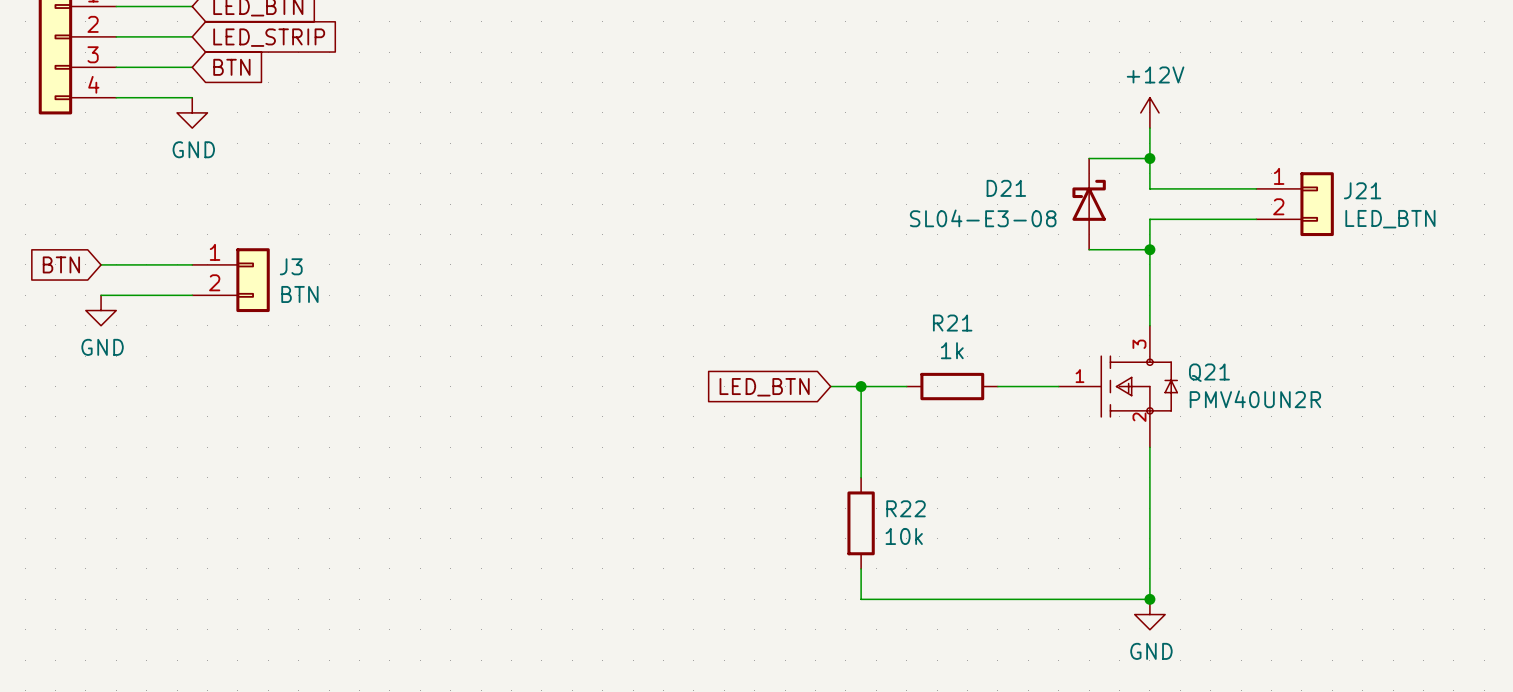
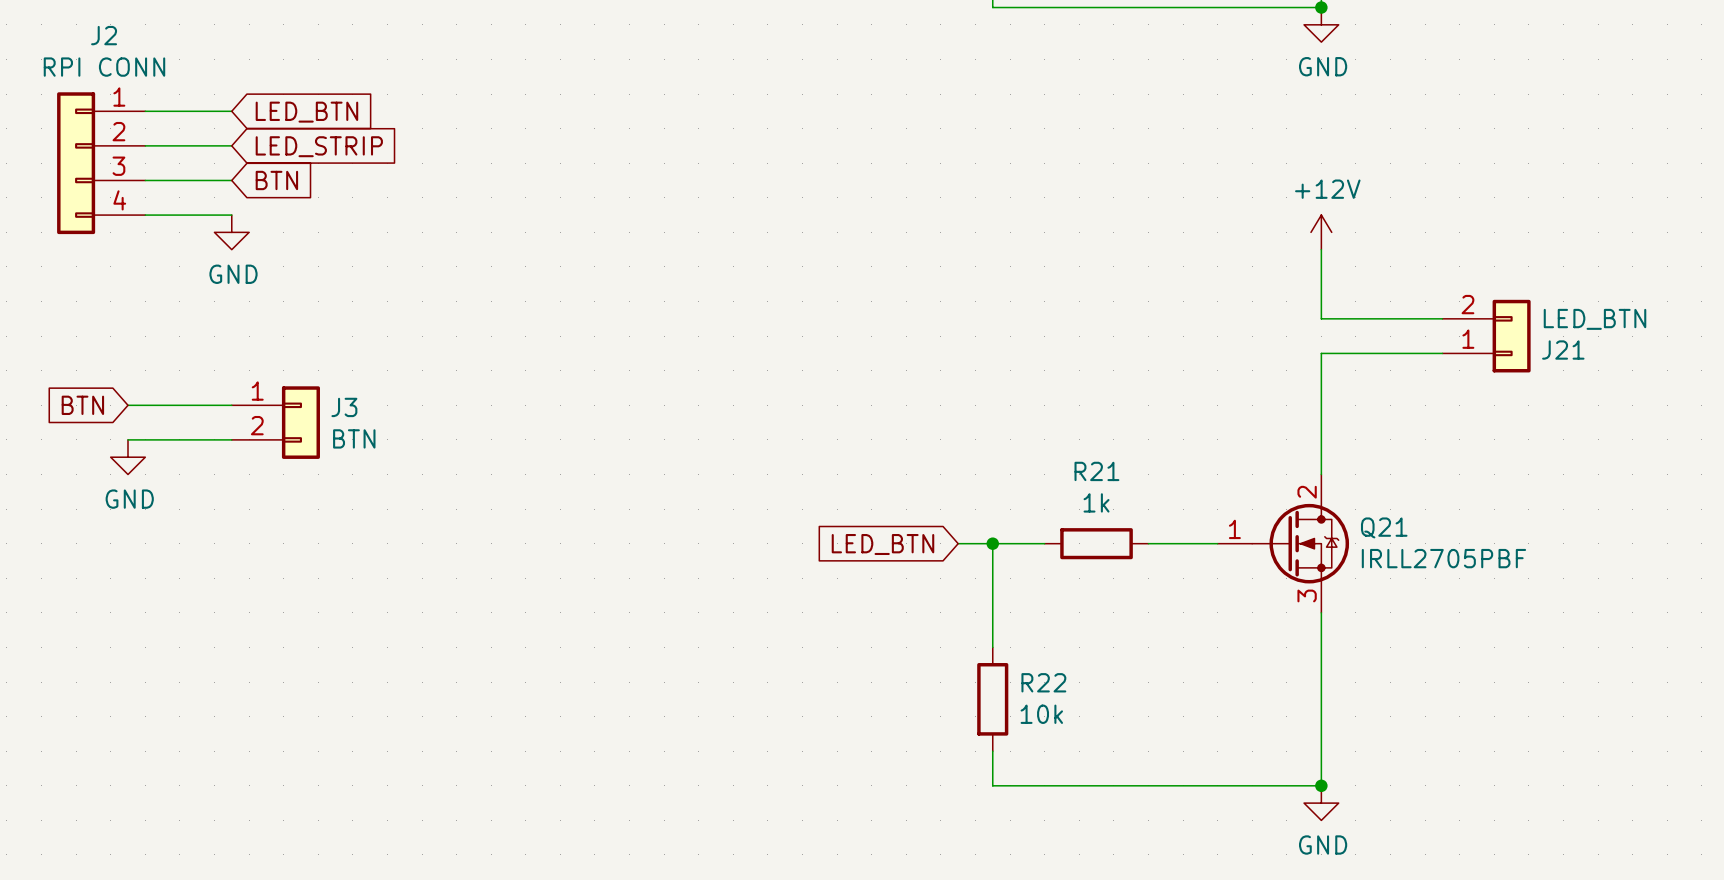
wire: (1089, 158) (1149, 158) -> none
junction: (1149, 158) -> none
D21: SL04-E3-08 (1089, 204) -> none
J21 flip: as is (1317, 204) -> up-down (1511, 336)
wire: (1089, 249) (1149, 249) -> none
junction: (1149, 249) -> none
Q21 symbol: [1058, 325, 1178, 448] -> [1217, 474, 1350, 613]
Q21 value: PMV40UN2R (1255, 399) -> IRLL2705PBF (1443, 558)

